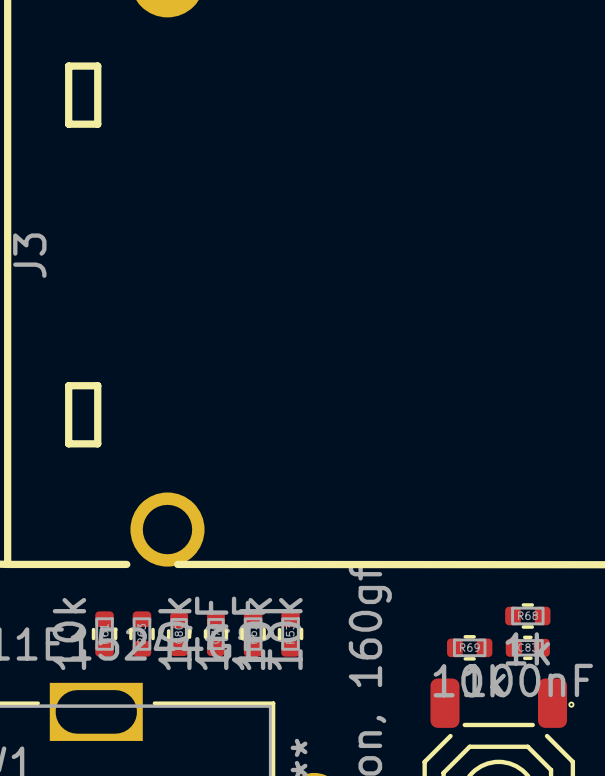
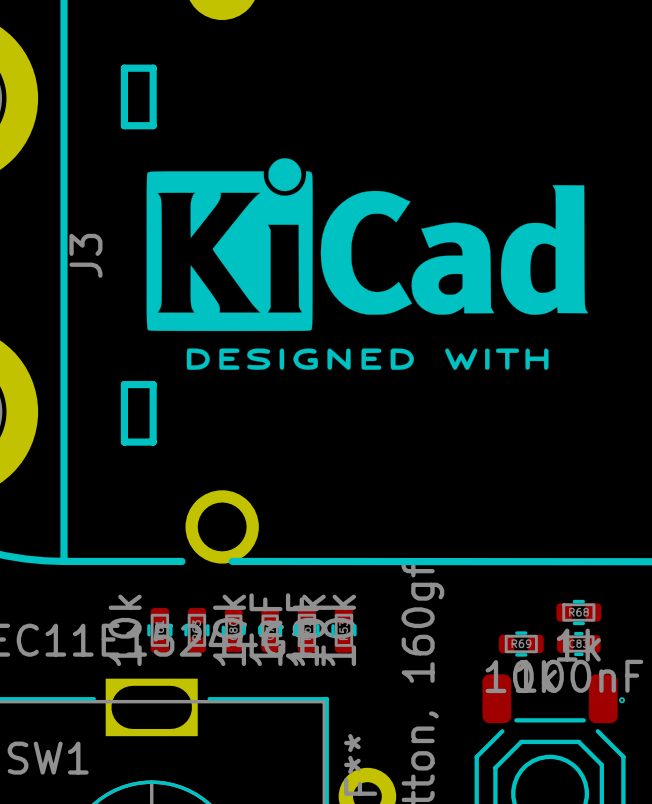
drawing: none -> [146, 158, 589, 370]

